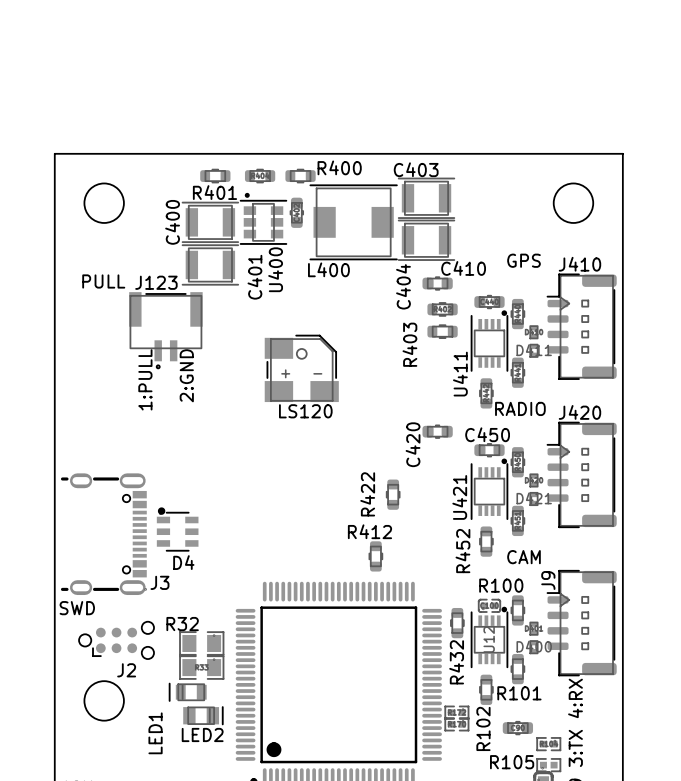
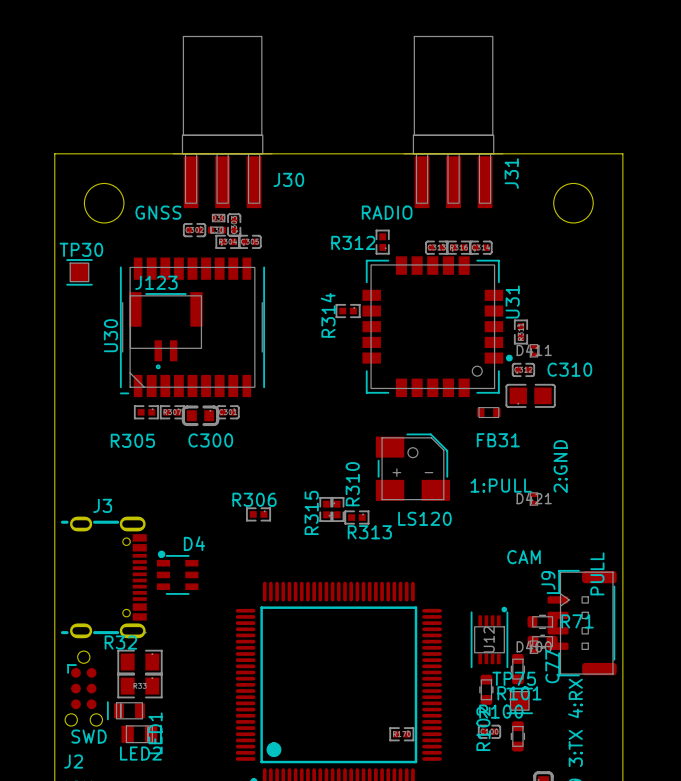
J30: none -> (222, 122)
J31: none -> (453, 122)
R401: (215, 176) -> none
part: (260, 176) -> none
R400: (300, 176) -> none
drawing: [244, 192, 250, 198] -> none
C403: (426, 198) -> none
text: none -> GNSS (158, 212)
part: (296, 212) -> none
part: none -> (218, 218)
C400: (210, 222) -> none
U400: (263, 222) -> none
L400: (353, 222) -> none
part: none -> (234, 224)
part: none -> (194, 230)
part: none -> (216, 230)
C404: (426, 240) -> none
part: none -> (227, 241)
part: none -> (250, 241)
R312: none -> (382, 242)
part: none -> (436, 247)
part: none -> (458, 247)
part: none -> (480, 247)
text: GPS (524, 260) -> none
C401: (210, 264) -> none
TP30: none -> (79, 272)
text: PULL (103, 281) -> none
C410: (437, 283) -> none
part: (489, 302) -> none
part: (442, 309) -> none
R314: none -> (348, 311)
part: (517, 314) -> none
U31: none -> (437, 326)
J410: (581, 326) -> none
U30: none -> (192, 327)
R403: (442, 331) -> none
part: none -> (520, 332)
part: (533, 332) -> none
U411: (489, 341) -> none
LS120 position: (301, 368) -> (412, 467)
part: none -> (523, 369)
part: (517, 372) -> none
text: 2:GND (186, 375) -> none
text: 1:PULL (145, 379) -> none
part: (486, 393) -> none
C310: none -> (530, 395)
text position: RADIO (520, 408) -> RADIO (387, 212)
LS120 name position: LS120 (305, 411) -> LS120 (424, 518)
R305: none -> (146, 412)
part: none -> (172, 412)
part: none -> (228, 412)
FB31: none -> (488, 412)
C300: none -> (200, 415)
C420: (437, 431) -> none
C450: (489, 450) -> none
part: (517, 462) -> none
text: none -> 2:GND (560, 466)
J420: (581, 474) -> none
part: (533, 480) -> none
text: none -> 1:PULL (501, 485)
U421: (489, 489) -> none
R422: (393, 494) -> none
R315: none -> (326, 509)
R310: none -> (337, 509)
R306: none -> (258, 514)
R313: none -> (356, 517)
part: (517, 520) -> none
D4 position: (177, 529) -> (177, 572)
J3 position: (103, 534) -> (103, 577)
R452: (486, 541) -> none
R412: (375, 556) -> none
D4 name position: D4 (183, 562) -> D4 (194, 543)
text: none -> PULL (597, 573)
J3 name position: J3 (159, 582) -> J3 (102, 505)
part position: (489, 605) -> (489, 731)
text position: SWD (77, 608) -> SWD (89, 736)
R100 position: (517, 610) -> (517, 736)
R71: none -> (542, 621)
R432: (457, 623) -> none
part: (533, 628) -> none
J2 rotation: 0° (116, 640) -> 90° clockwise (83, 688)
J2 position: (116, 640) -> (83, 688)
C77: none -> (542, 641)
R32 position: (201, 643) -> (139, 662)
part position: (201, 667) -> (139, 686)
J2 name position: J2 (126, 670) -> J2 (73, 761)
round board edge: [84, 680, 125, 721] -> none
LED1 position: (187, 692) -> (125, 710)
TP75: none -> (519, 700)
part: (456, 712) -> none
LED2 position: (203, 715) -> (141, 734)
part position: (456, 724) -> (401, 734)
part: (517, 728) -> none
part: (548, 744) -> none
R105: (548, 765) -> none

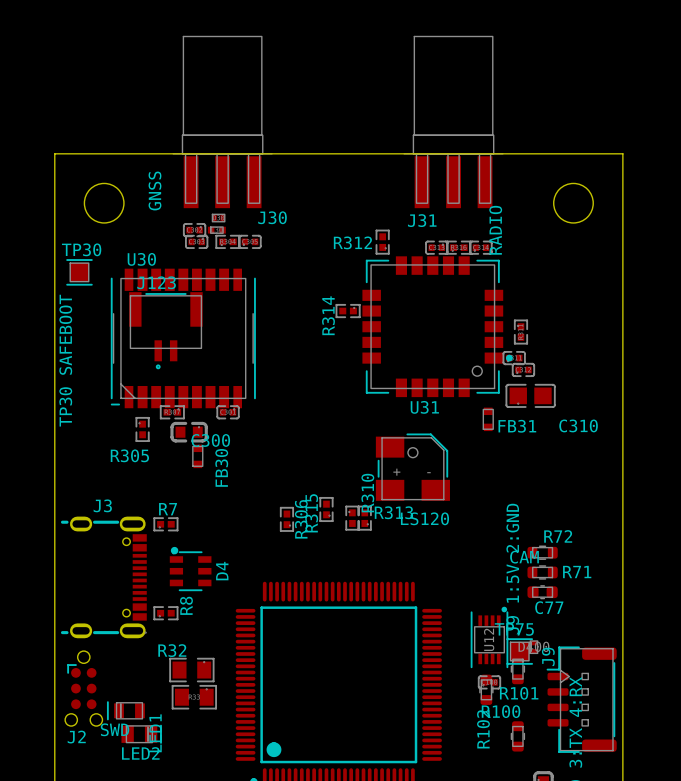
J31 name rotation: 0° (511, 173) -> 90° clockwise (422, 220)
J31 name position: J31 (511, 173) -> J31 (422, 220)
J30 name position: J30 (288, 179) -> J30 (272, 217)
text rotation: 0° (158, 212) -> 90° counterclockwise (154, 191)
text rotation: 0° (387, 212) -> 90° counterclockwise (495, 230)
text position: RADIO (387, 212) -> RADIO (495, 230)
part rotation: 0° (234, 224) -> 90° counterclockwise (196, 241)
part position: (234, 224) -> (196, 241)
U31 name rotation: 0° (512, 302) -> 90° clockwise (424, 407)
U31 name position: U31 (512, 302) -> U31 (424, 407)
U30 position: (192, 327) -> (183, 338)
U30 name rotation: 0° (110, 335) -> 90° clockwise (141, 259)
U30 name position: U30 (110, 335) -> U30 (141, 259)
D411: (533, 350) -> none
part: none -> (514, 358)
text: none -> TP30 SAFEBOOT (65, 360)
C310 name position: C310 (569, 369) -> C310 (578, 425)
R305 rotation: 0° (146, 412) -> 90° counterclockwise (142, 429)
R305 position: (146, 412) -> (142, 429)
FB31 rotation: 0° (488, 412) -> 90° clockwise (488, 419)
C300 position: (200, 415) -> (189, 432)
FB31 name position: FB31 (498, 440) -> FB31 (517, 426)
FB30: none -> (197, 456)
text: 2:GND (560, 466) -> none
text: 1:PULL (501, 485) -> none
D421: (533, 498) -> none
R310 position: (337, 509) -> (352, 518)
R306 rotation: 0° (258, 514) -> 90° clockwise (286, 519)
R306 position: (258, 514) -> (286, 519)
R313 rotation: 0° (356, 517) -> 90° clockwise (364, 518)
R7: none -> (165, 524)
R313 name position: R313 (369, 532) -> R313 (393, 512)
D4 name rotation: 0° (194, 543) -> 90° counterclockwise (222, 571)
D4 name position: D4 (194, 543) -> D4 (222, 571)
R72: none -> (542, 552)
text: none -> J9 1:5V 2:GND (512, 569)
D4 position: (177, 572) -> (190, 569)
text: PULL (597, 573) -> none
R8: none -> (165, 613)
R71 position: (542, 621) -> (542, 572)
J9 position: (581, 623) -> (581, 699)
C77 position: (542, 641) -> (542, 592)
R32 position: (139, 662) -> (191, 670)
C77 name rotation: 0° (552, 666) -> 90° clockwise (549, 607)
part position: (139, 686) -> (194, 697)
TP75 position: (519, 700) -> (519, 651)
part position: (489, 731) -> (489, 682)
part: (401, 734) -> none
text position: SWD (89, 736) -> SWD (115, 729)
J2 name position: J2 (73, 761) -> J2 (76, 737)

